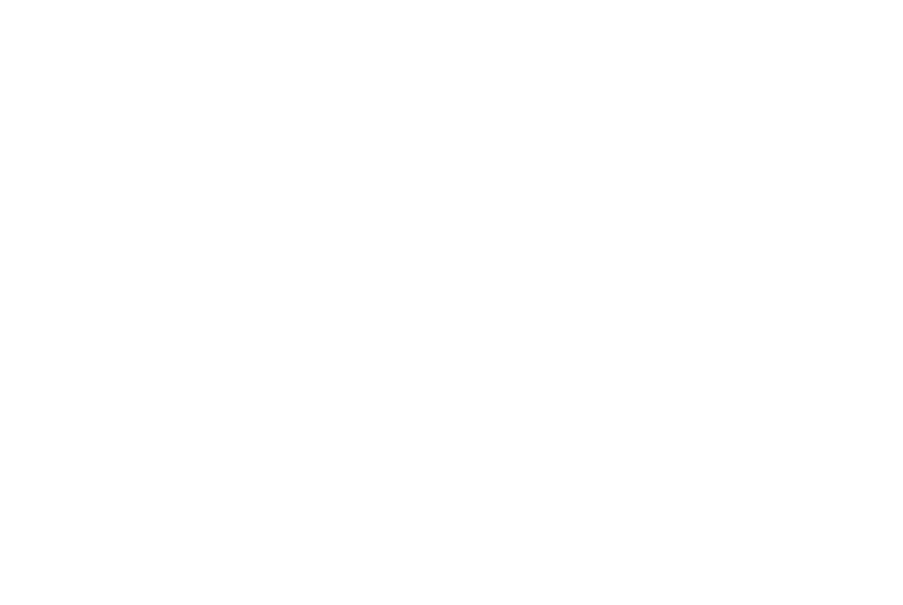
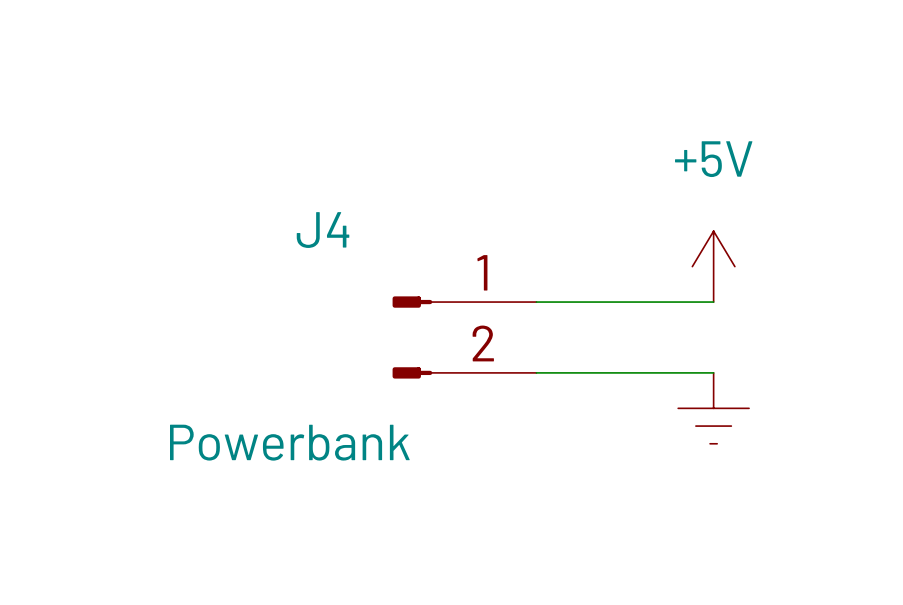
power symbol: none -> +5V (713, 266)
wire: none -> (536, 302) (713, 302)
J4: none -> Powerbank (464, 337)
wire: none -> (536, 372) (713, 372)
power symbol: none -> (713, 408)

